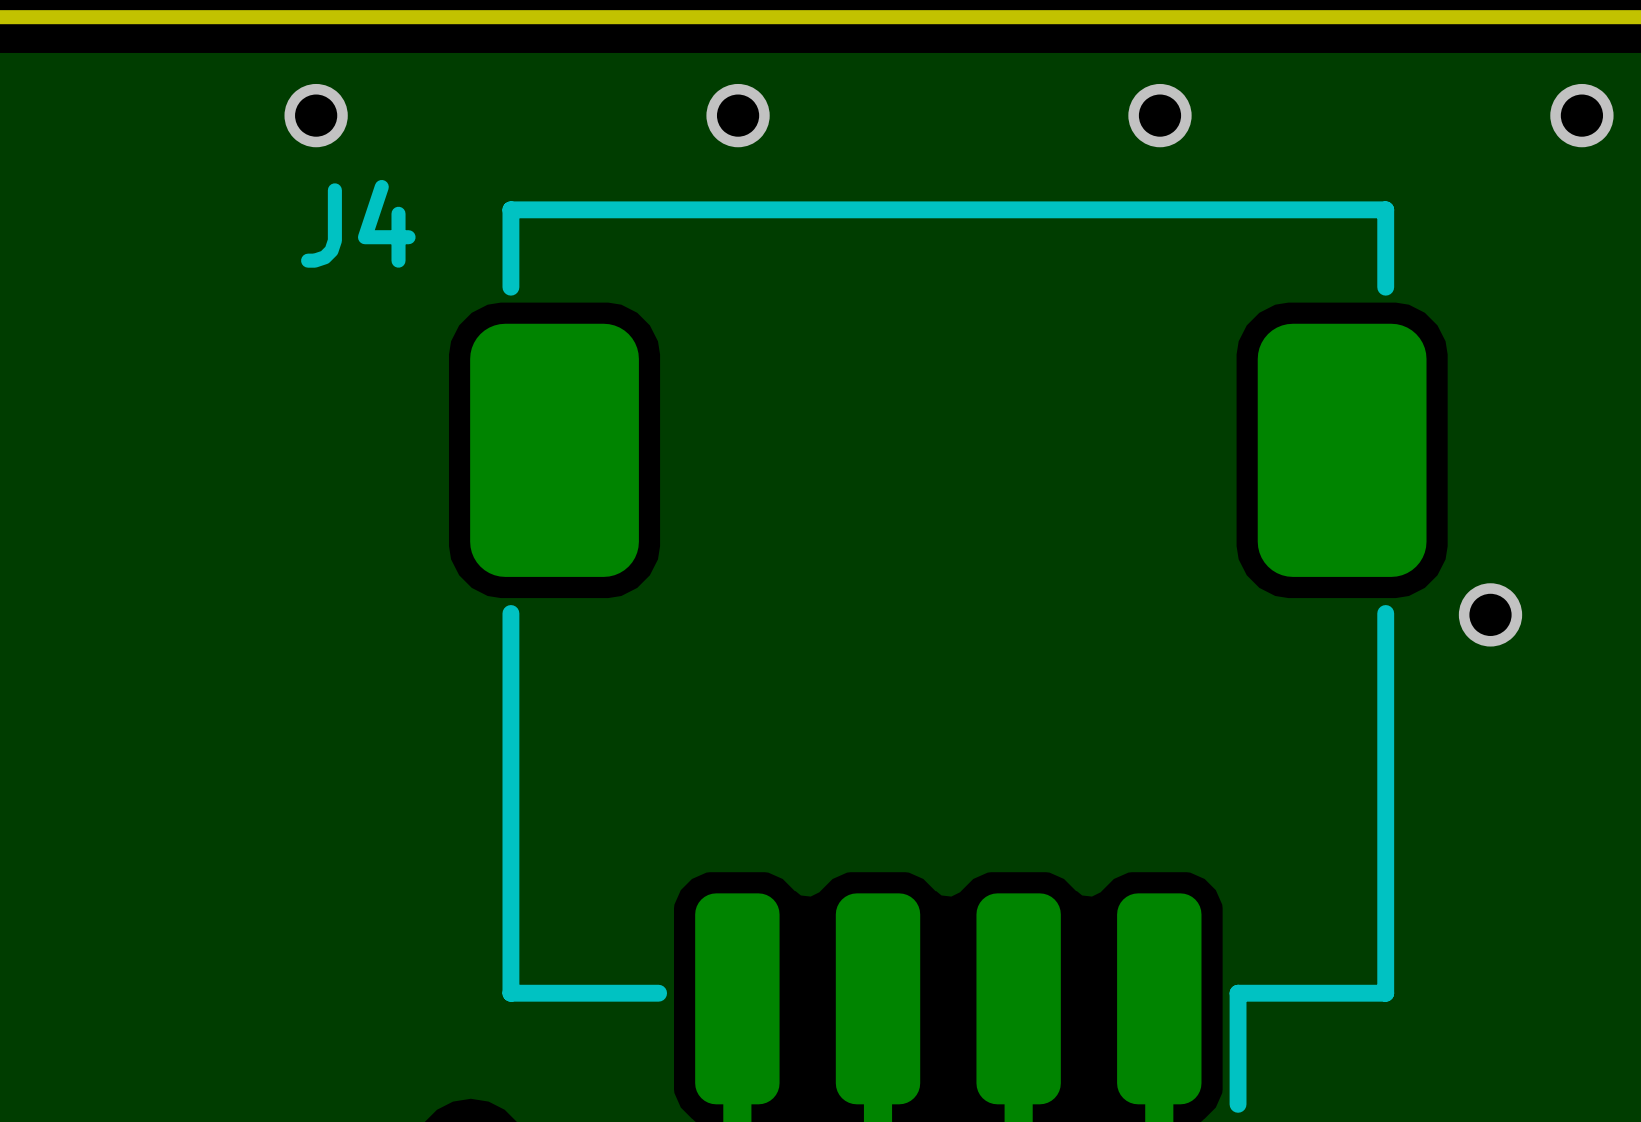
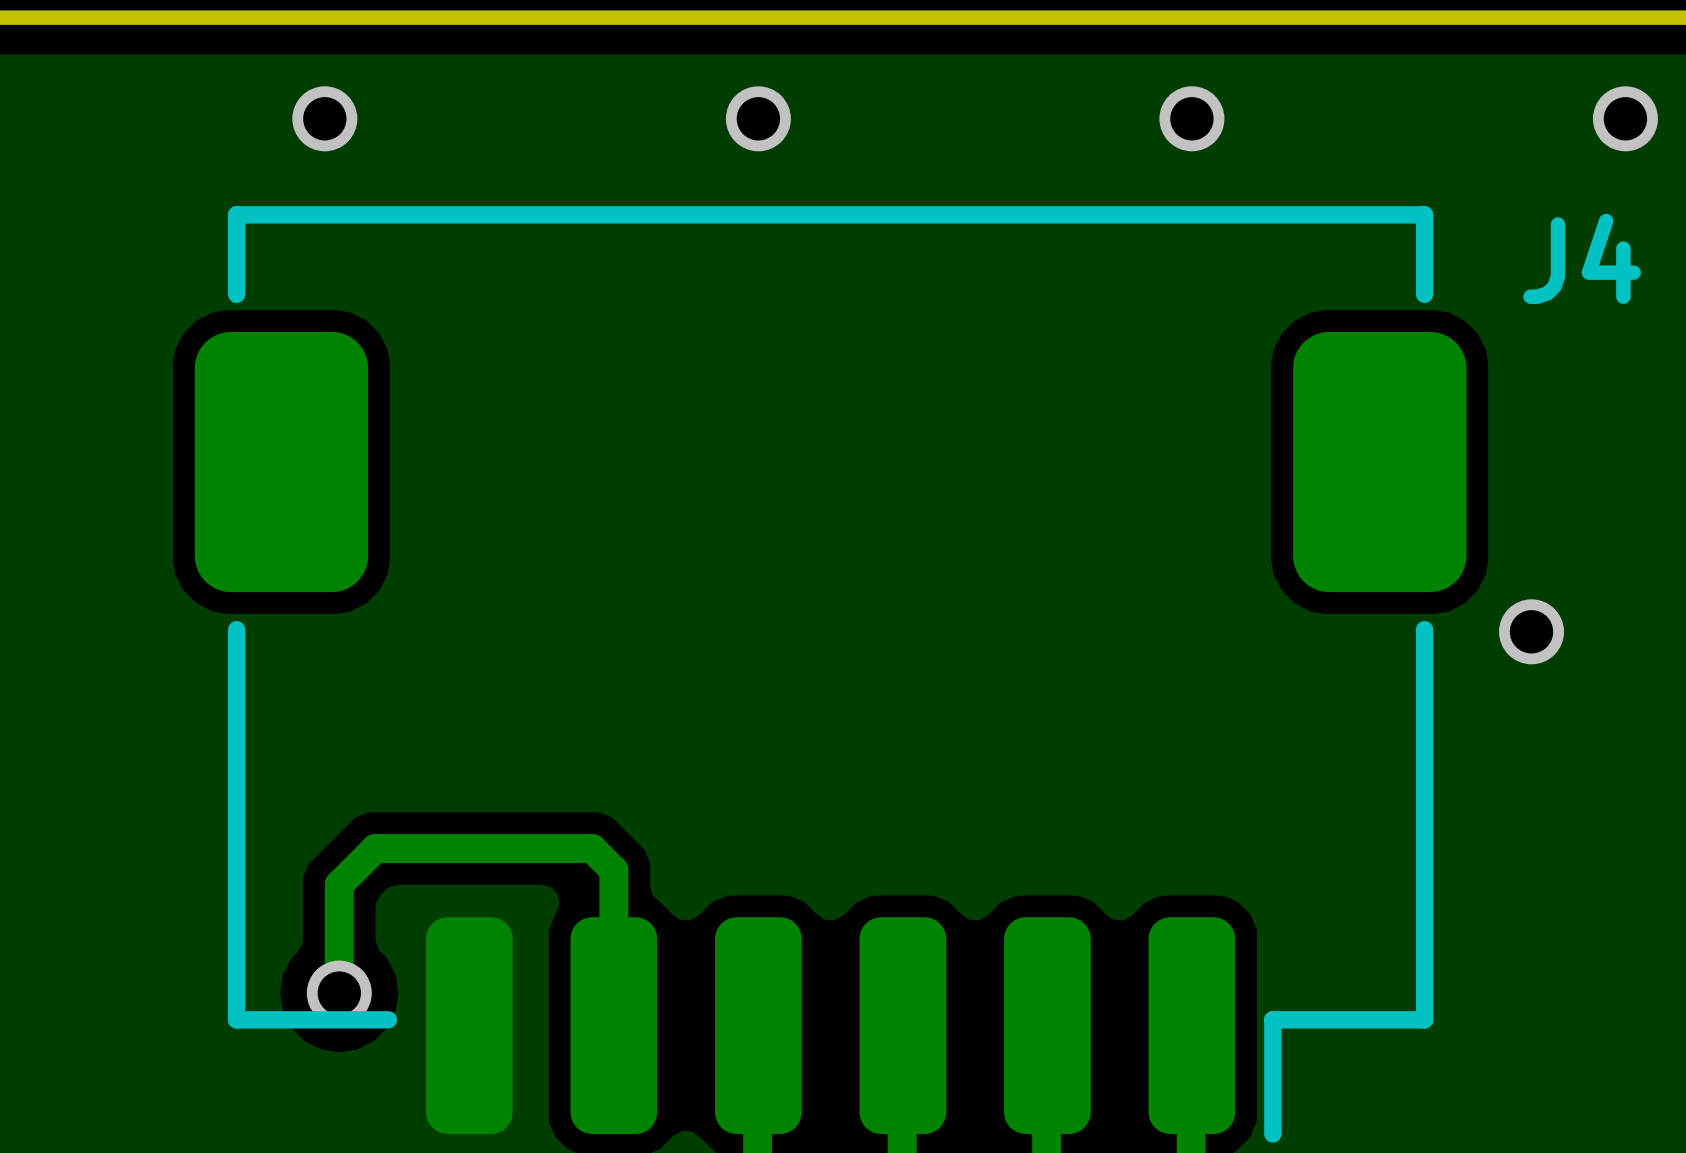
J4 footprint: [470, 201, 1427, 1113] -> [194, 206, 1467, 1143]
J4 name position: J4 (358, 223) -> J4 (1582, 258)
track: none -> (339, 993) (339, 884) (375, 848) (592, 848) (613, 870) (613, 1025)
via: none -> (339, 993)

